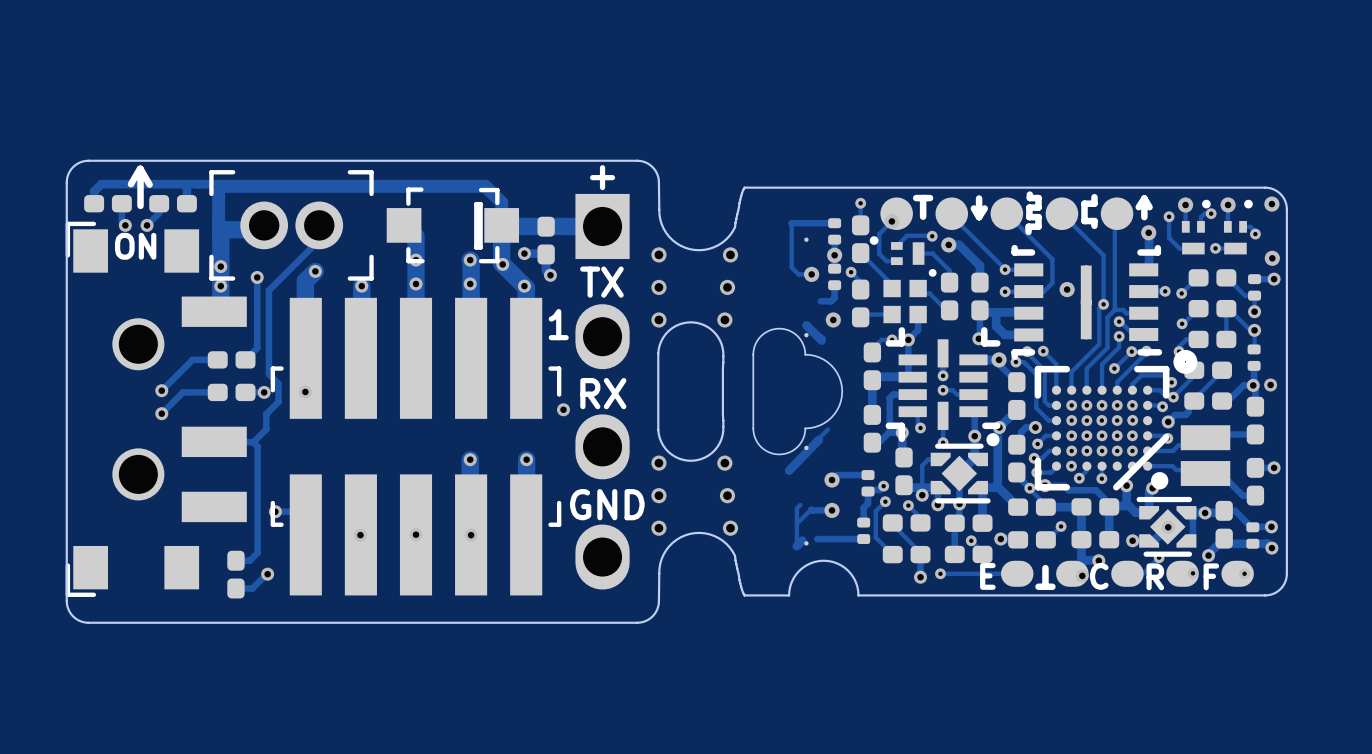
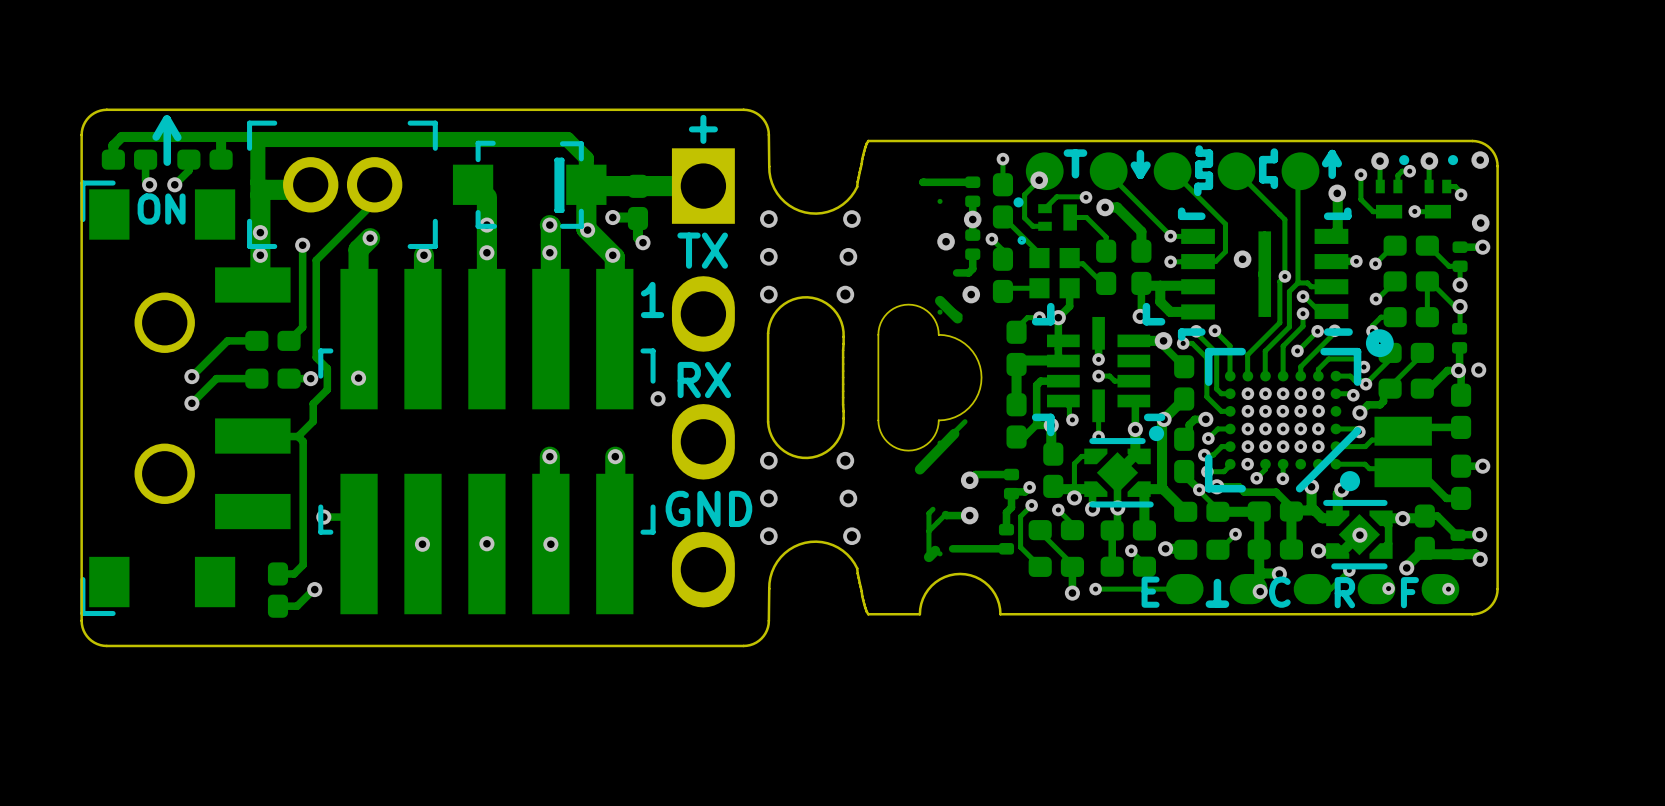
track: (791, 223) (791, 267) (798, 274) (811, 274) -> none
part rotation: 0° (910, 296) -> 90° counterclockwise (1048, 267)

